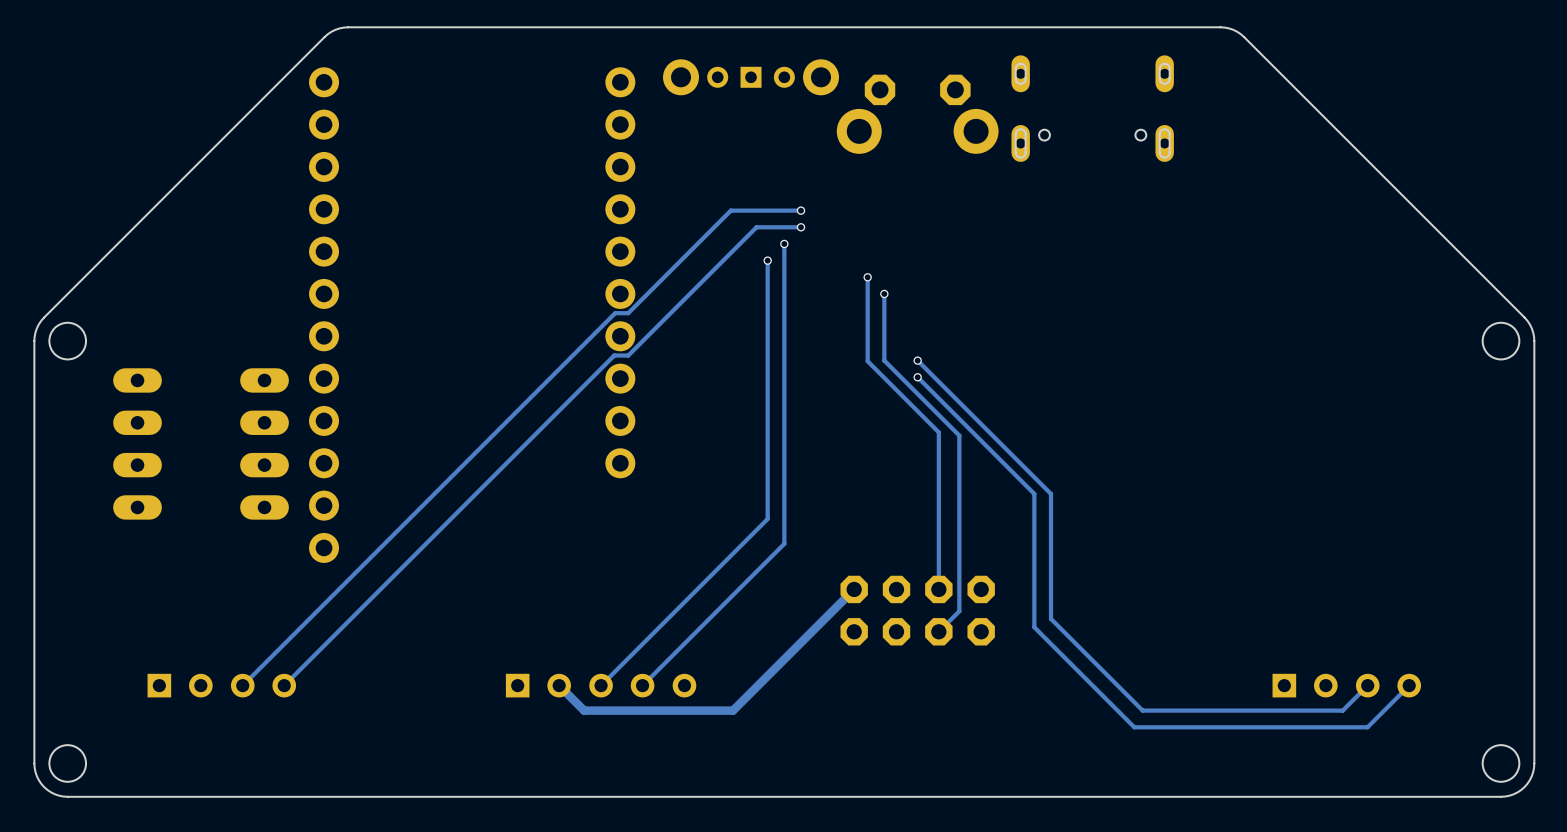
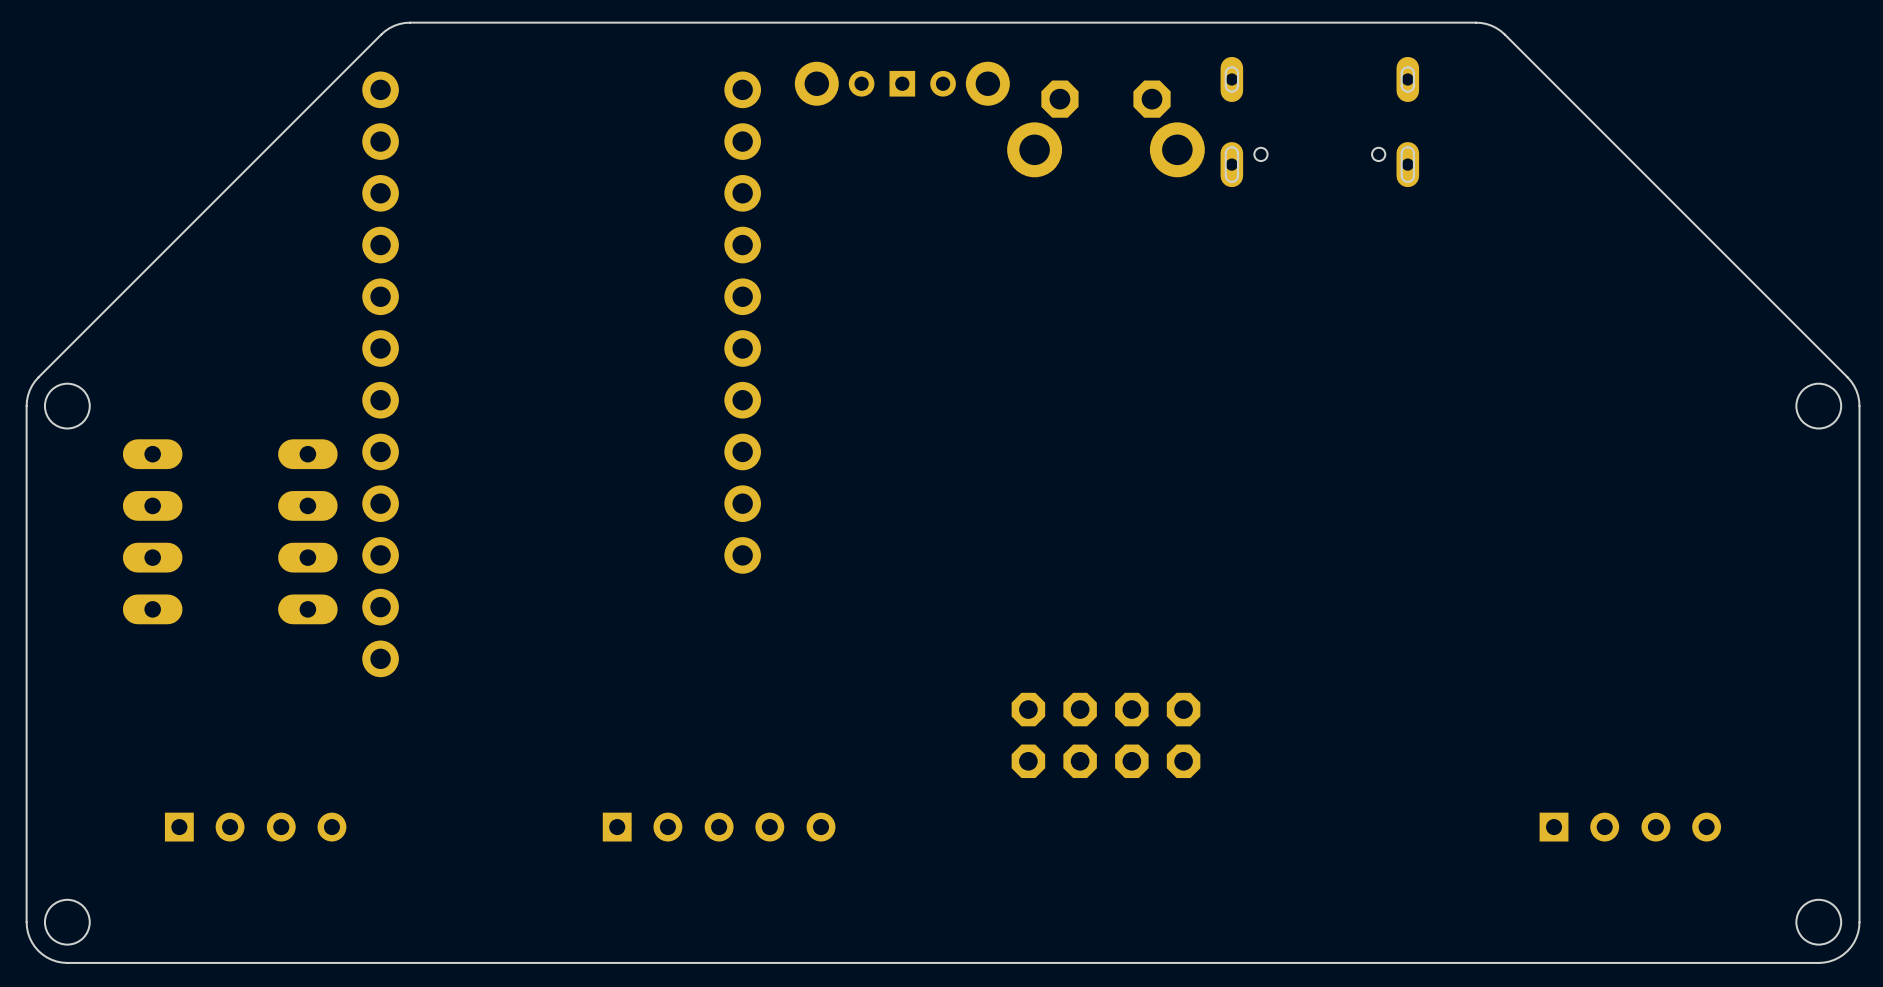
track: (801, 210) (730, 210) (628, 313) (615, 313) (242, 685) -> none
via: (801, 210) -> none
track: (801, 227) (756, 227) (628, 355) (614, 355) (284, 685) -> none
via: (801, 227) -> none
track: (784, 243) (784, 543) (642, 685) -> none
via: (784, 243) -> none
track: (767, 260) (767, 519) (601, 685) -> none
via: (767, 260) -> none
track: (867, 277) (867, 361) (938, 432) (938, 589) -> none
via: (867, 277) -> none
track: (884, 293) (884, 360) (959, 435) (959, 611) (938, 631) -> none
via: (884, 293) -> none
track: (917, 360) (1051, 493) (1051, 618) (1142, 710) (1342, 710) (1367, 685) -> none
via: (917, 360) -> none
track: (917, 377) (1034, 493) (1034, 627) (1134, 727) (1367, 727) (1409, 685) -> none
via: (917, 377) -> none
track: (854, 589) (733, 710) (584, 710) (559, 685) -> none

